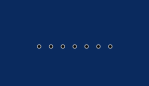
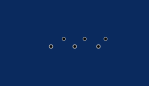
via: none -> (63, 38)
via: none -> (84, 38)
via: none -> (105, 38)
via: (39, 46) -> none
via: (62, 46) -> none
via: (86, 46) -> none
via: (110, 46) -> none

